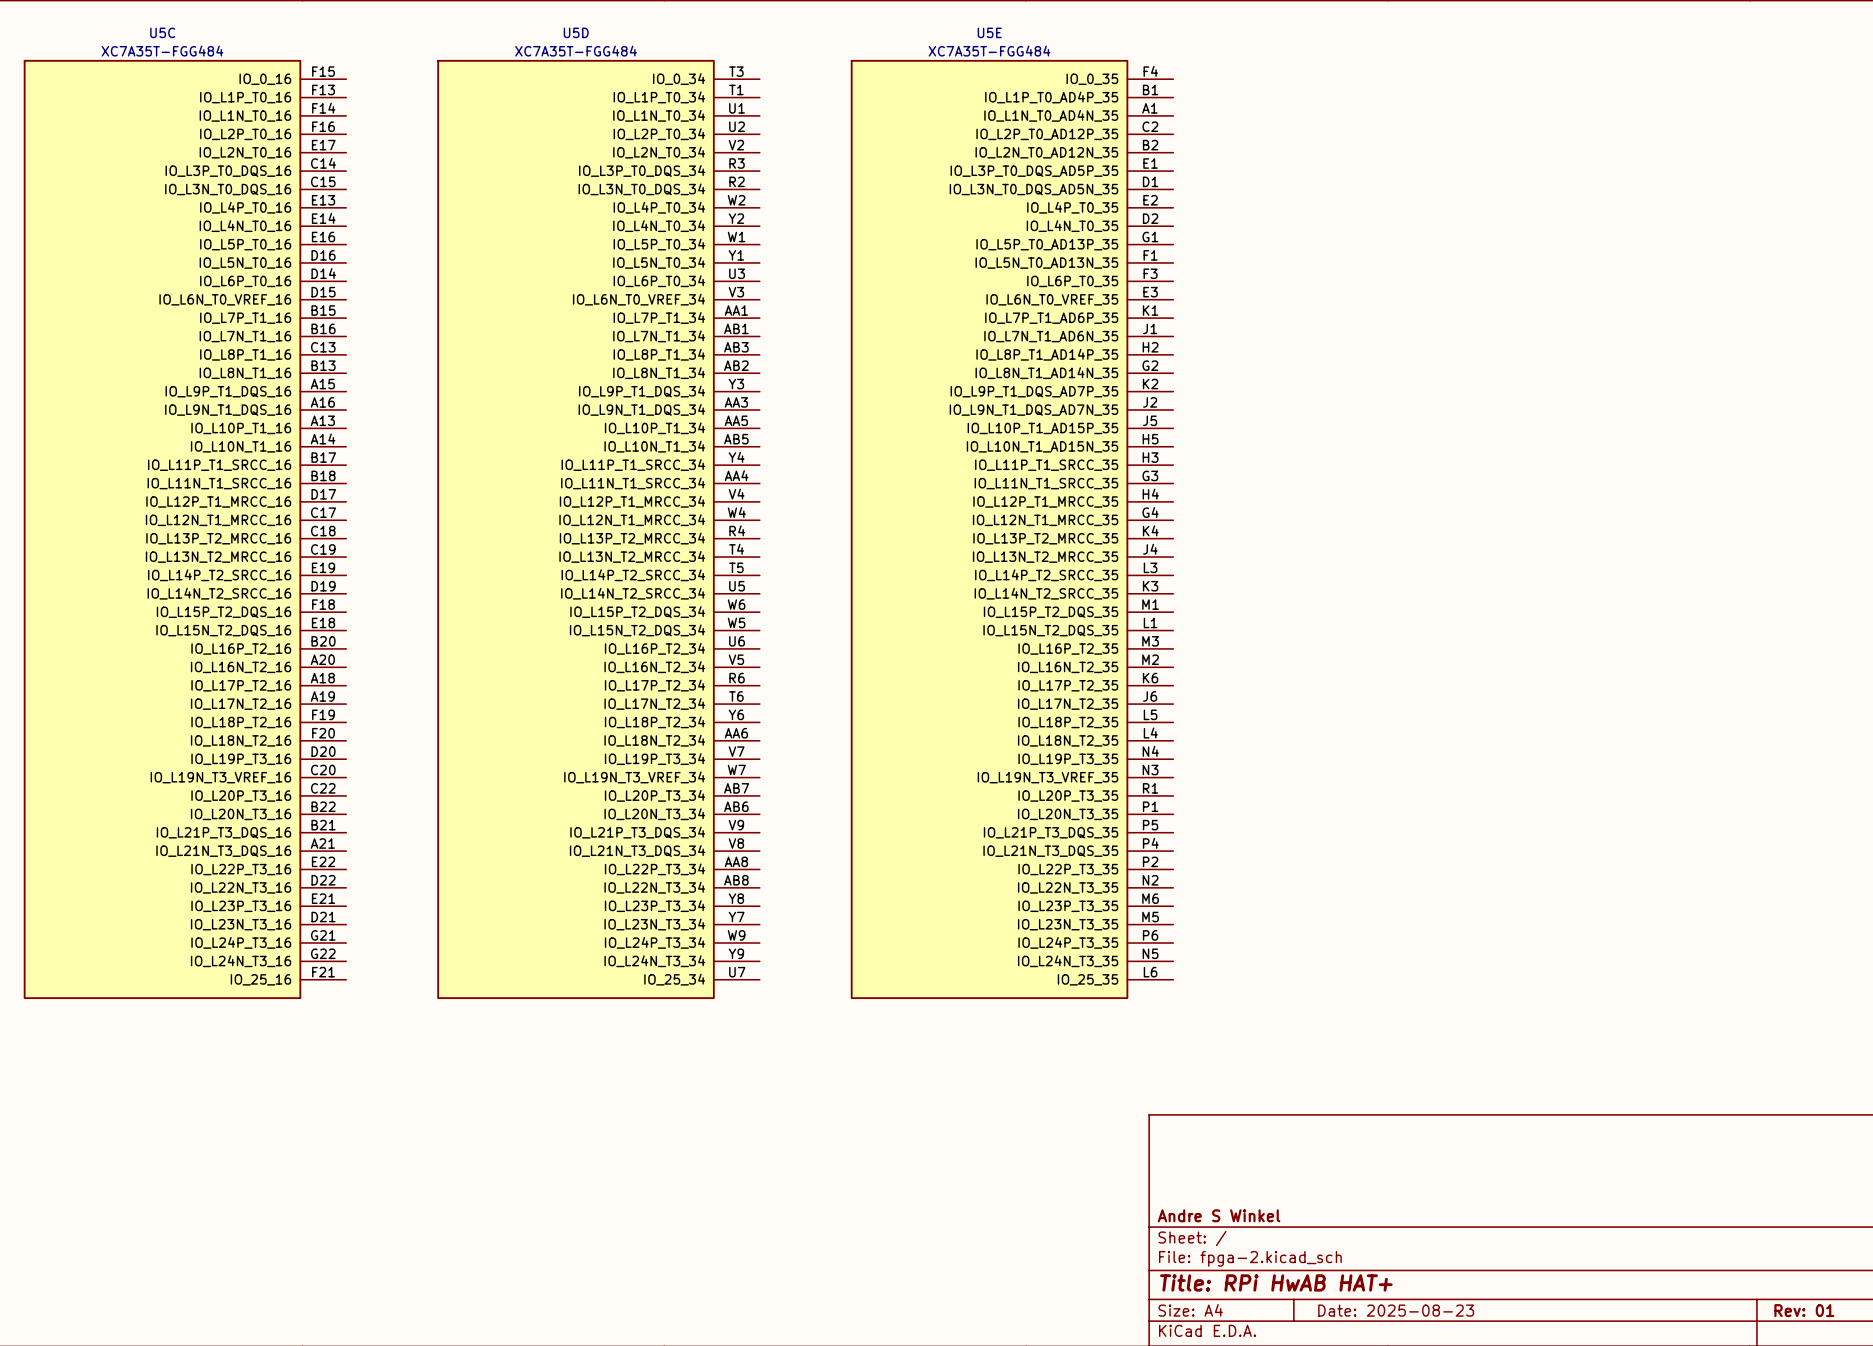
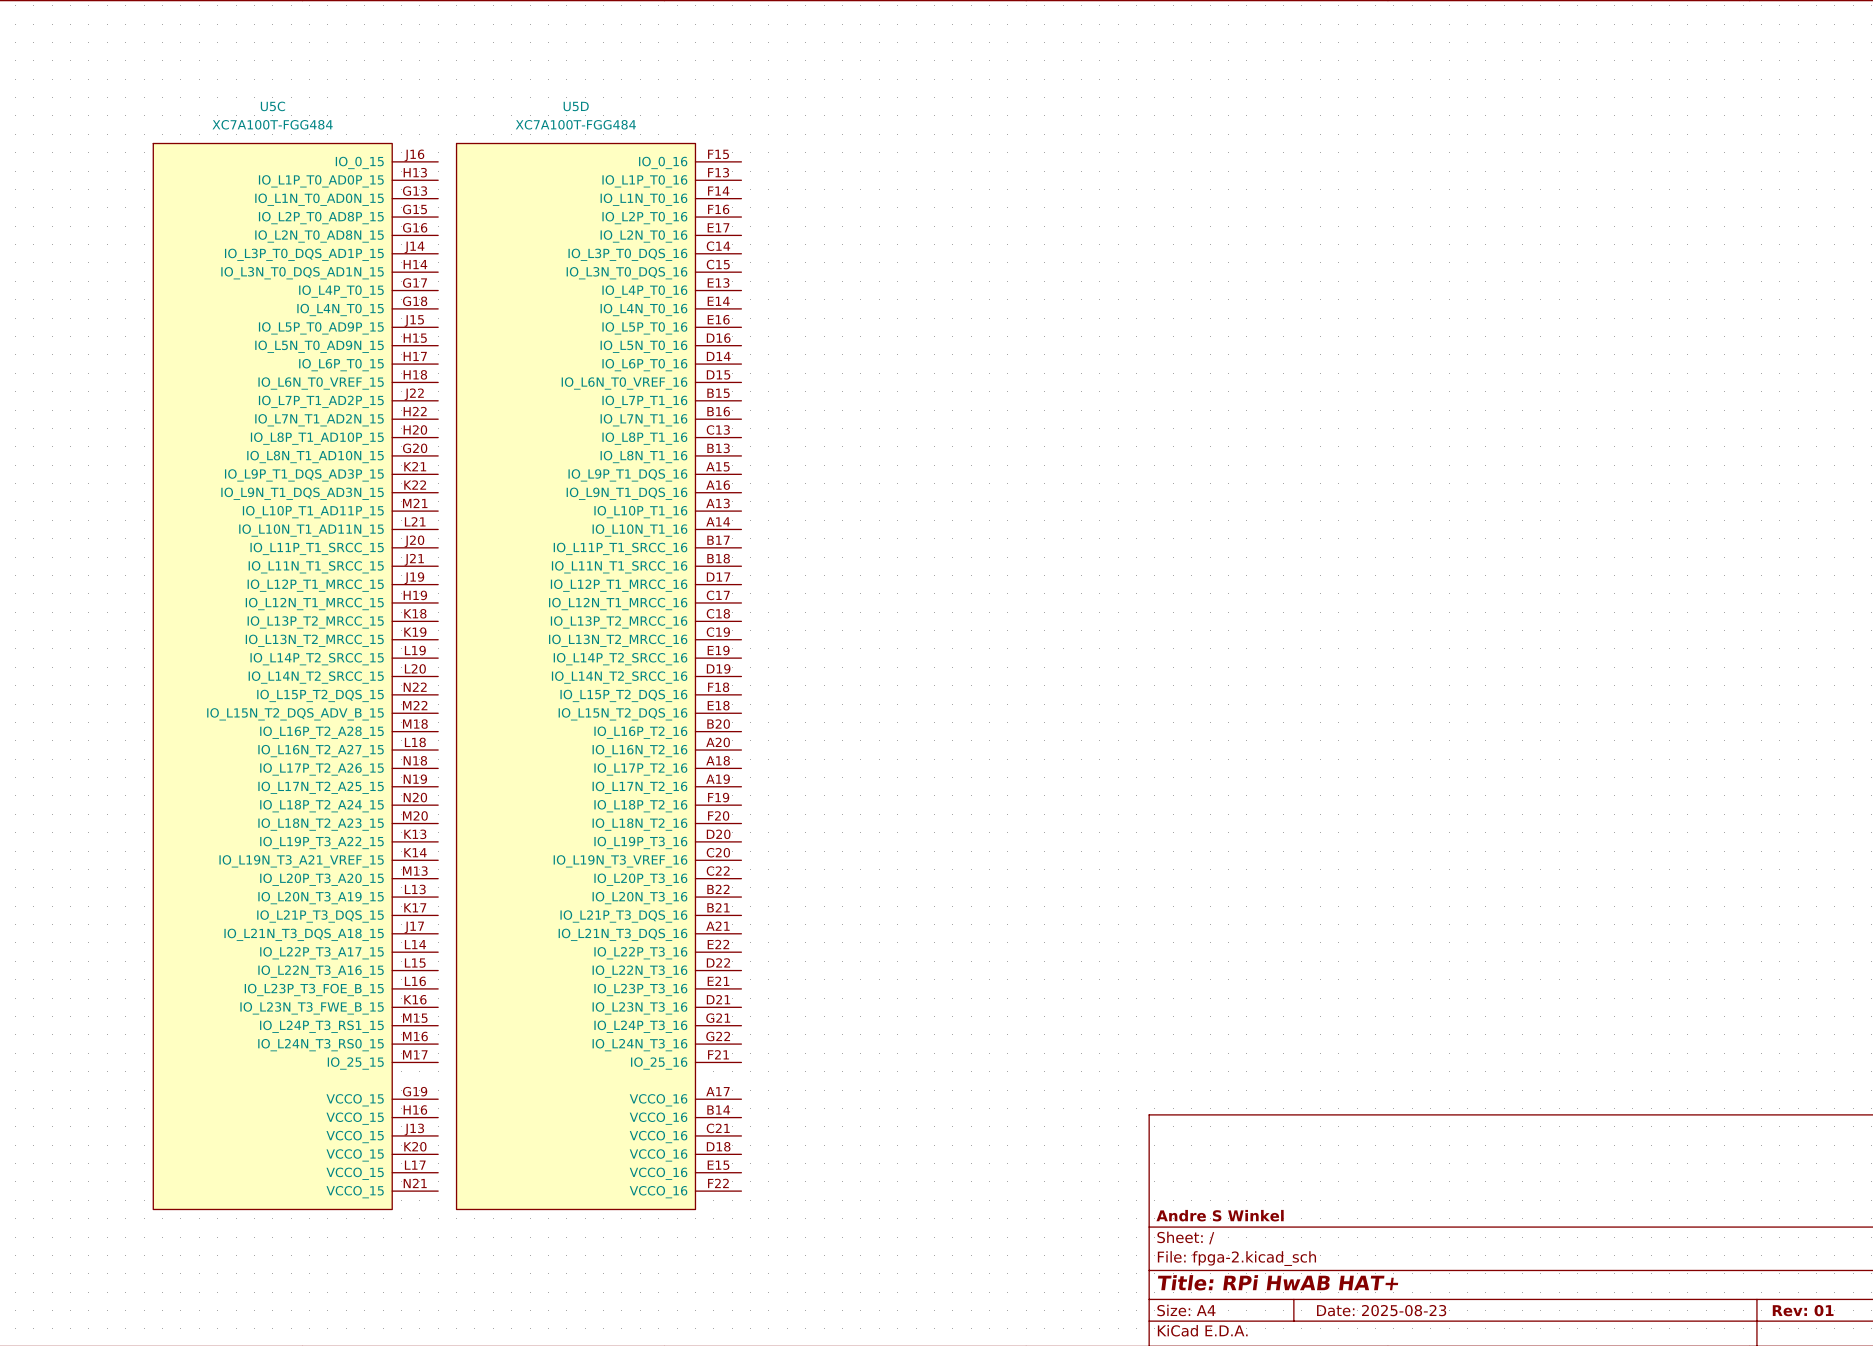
U5C name position: U5C (162, 32) -> U5C (272, 106)
U5D name position: U5D (576, 32) -> U5D (576, 106)
U5C value: XC7A35T-FGG484 (162, 51) -> XC7A100T-FGG484 (272, 124)
U5D value: XC7A35T-FGG484 (576, 51) -> XC7A100T-FGG484 (575, 124)
U5C symbol: [23, 59, 347, 1000] -> [153, 143, 439, 1210]
U5D symbol: [437, 59, 760, 1000] -> [456, 143, 742, 1210]
U5E: XC7A35T-FGG484 (1012, 529) -> none

